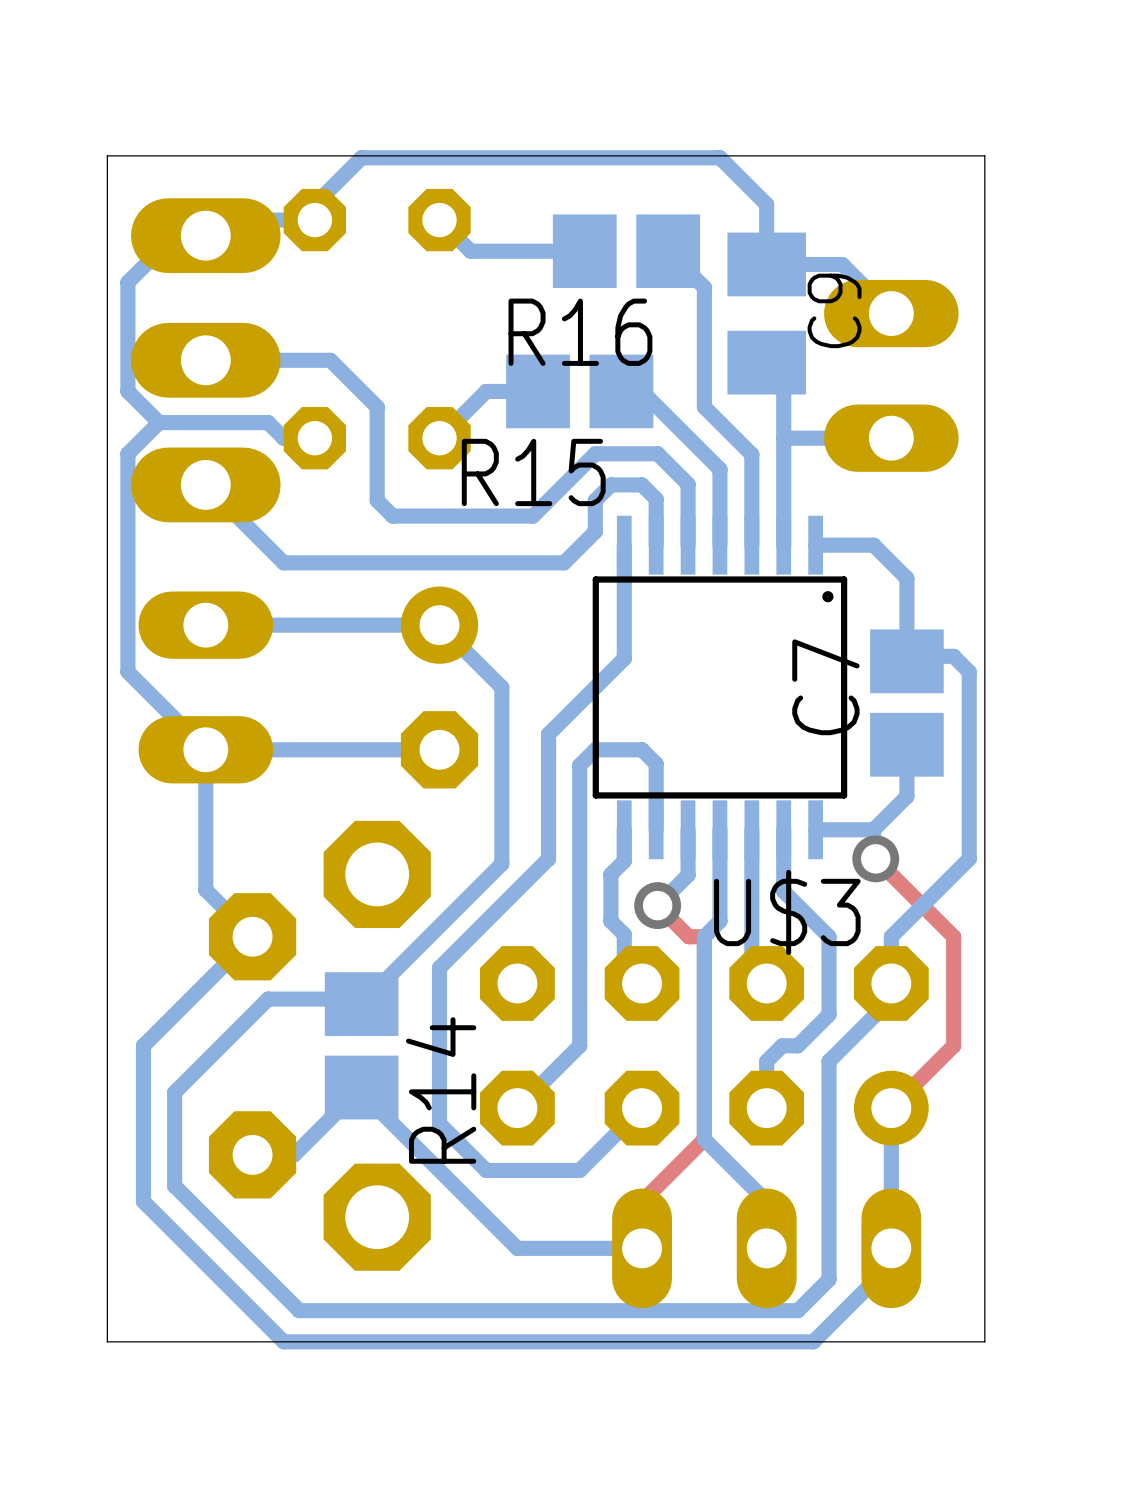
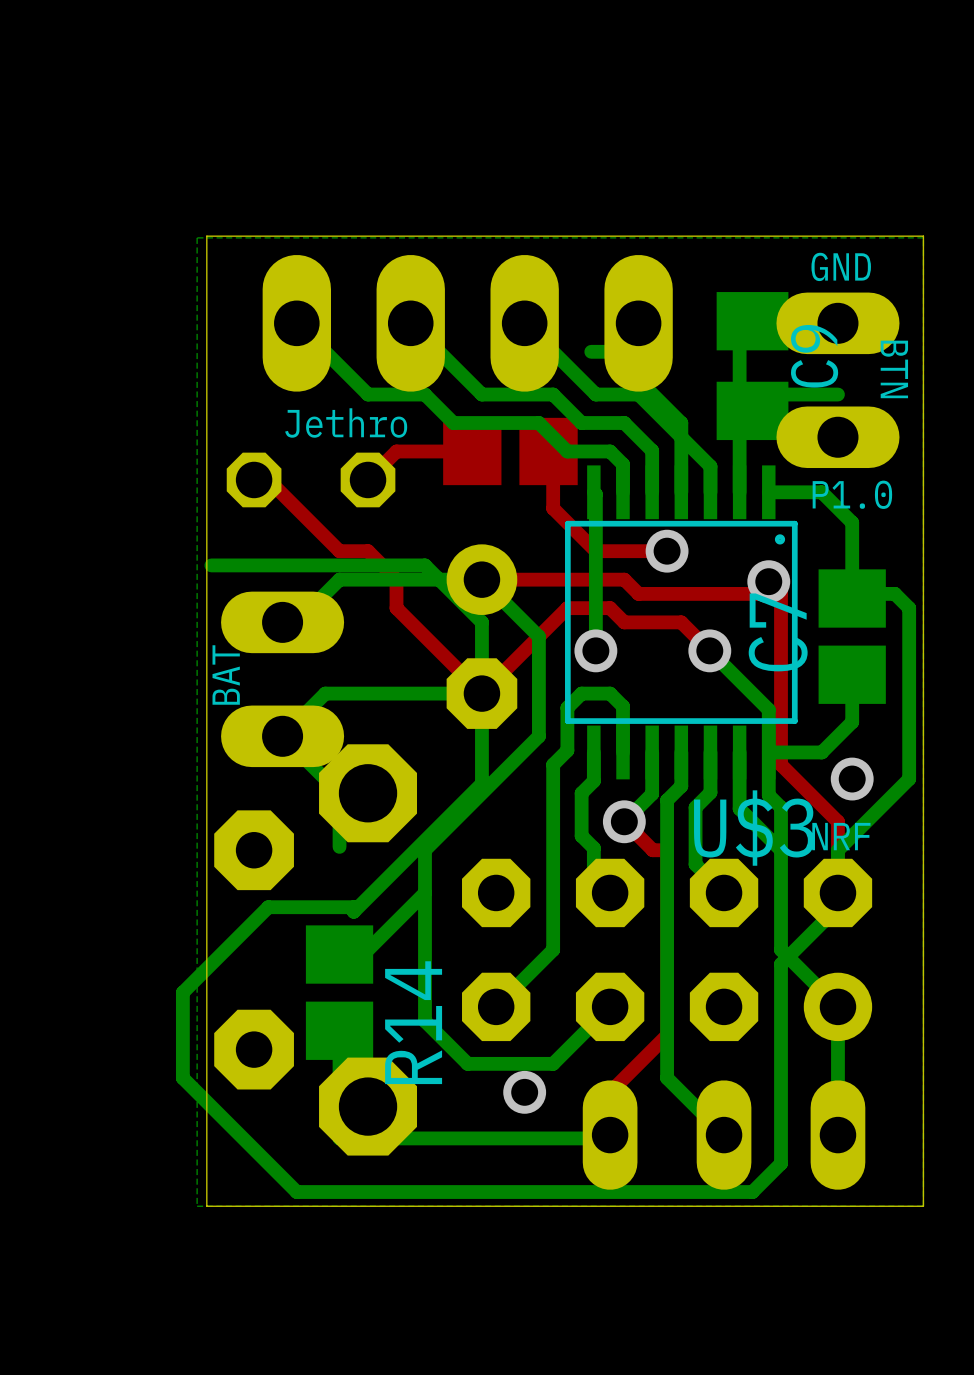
part: (377, 220) -> none
bottom track: (439, 220) (470, 251) (584, 251) -> none
R16: (626, 251) -> none
bottom track: (668, 251) (704, 287) (704, 407) (751, 454) (751, 516) -> (524, 323) (595, 394) (638, 394) (710, 466)
board edge: (984, 264) (984, 155) (107, 155) (107, 1341) (984, 1341) (984, 1326) -> (923, 236) (206, 236) (206, 1206) (923, 1206)
bottom zone outline: none -> (923, 237) (197, 237) (197, 1206) (923, 1206) (923, 237)
text: none -> GND (841, 266)
C9 position: (766, 313) -> (752, 366)
bottom track: (891, 313) (842, 264) (766, 264) (766, 204) (719, 157) (361, 157) (314, 204) (314, 220) (221, 220) (205, 235) (174, 235) (127, 282) (127, 391) (159, 422) -> none
bottom track: (205, 360) (330, 360) (377, 407) (377, 500) (392, 516) (532, 516) (595, 453) (657, 453) (688, 484) (688, 499) -> (410, 323) (481, 394) (553, 394) (581, 423) (624, 423) (652, 450)
part: (205, 360) -> none
part: none -> (467, 323)
part position: (891, 375) -> (837, 380)
bottom track: (538, 391) (486, 391) (439, 438) -> none
R15 side: bottom (579, 391) -> top (510, 451)
text: none -> BTN (894, 369)
bottom track: (159, 422) (268, 422) (283, 438) (314, 438) -> none
bottom track: (159, 422) (127, 453) (127, 671) (205, 749) -> none
part: (377, 438) -> none
text: none -> Jethro (346, 422)
bottom track: (205, 484) (283, 562) (564, 562) (595, 531) (595, 500) (610, 484) (642, 484) (656, 499) (656, 514) -> (296, 323) (368, 394) (424, 394) (453, 423) (538, 423) (567, 451) (610, 451) (623, 464)
top track: none -> (472, 451) (396, 451) (368, 479)
top track: none -> (548, 451) (553, 456) (553, 508) (595, 551) (667, 551)
top track: none -> (254, 479) (268, 479) (339, 551) (368, 551) (396, 579) (396, 608) (481, 693) (567, 608) (610, 608) (624, 622) (681, 622) (709, 650)
part: none -> (311, 479)
bottom track: (624, 545) (624, 658) (548, 734) (548, 858) (439, 967) -> (593, 492) (595, 494) (595, 650)
text: none -> P1.0 (852, 494)
via: none -> (667, 551)
top track: none -> (481, 579) (624, 579) (638, 593) (756, 593) (768, 581) (781, 593) (781, 764) (837, 821) (837, 892)
via: none -> (768, 581)
part position: (205, 687) -> (282, 679)
bottom track: none -> (282, 622) (296, 622) (339, 579) (481, 579) (538, 636) (538, 736) (424, 850) (424, 878)
part position: (439, 687) -> (481, 636)
via: none -> (595, 650)
bottom track: none -> (709, 650) (768, 709) (768, 795) (781, 807) (781, 850)
via: none -> (709, 650)
text: none -> BAT (226, 674)
bottom track: (205, 749) (205, 890) (252, 936) (143, 1045) (143, 1201) (283, 1341) (813, 1341) (891, 1263) (891, 1248) -> none
bottom track: (439, 749) (205, 749) -> none
bottom track: none -> (481, 693) (325, 693) (282, 736) (339, 793) (339, 846)
bottom track: (656, 779) (656, 763) (642, 749) (595, 749) (579, 765) (579, 843) -> (623, 706) (610, 693) (581, 693) (567, 707) (567, 750) (553, 764)
top track: (875, 858) (953, 936) (953, 1045) (891, 1108) -> none
via position: (875, 858) -> (852, 779)
bottom track: (719, 866) (719, 921) (704, 936) -> (681, 786) (667, 800) (667, 850)
bottom track: (751, 873) (751, 968) -> (710, 792) (695, 807) (695, 864) (710, 879)
text: none -> NRF (841, 836)
bottom track: none -> (424, 892) (363, 954) (339, 954)
bottom track: (829, 1014) (797, 1045) (782, 1045) (766, 1061) (766, 1108) -> (781, 921) (781, 949) (837, 1006)
R14 position: (361, 1045) -> (339, 992)
bottom track: (704, 1139) (766, 1201) (766, 1248) -> (667, 1035) (667, 1078) (724, 1135)
bottom track: (252, 1154) (294, 1154) (361, 1087) (361, 1092) (517, 1248) (642, 1248) -> (339, 1030) (339, 1138) (606, 1138) (610, 1135)
via: none -> (524, 1092)

